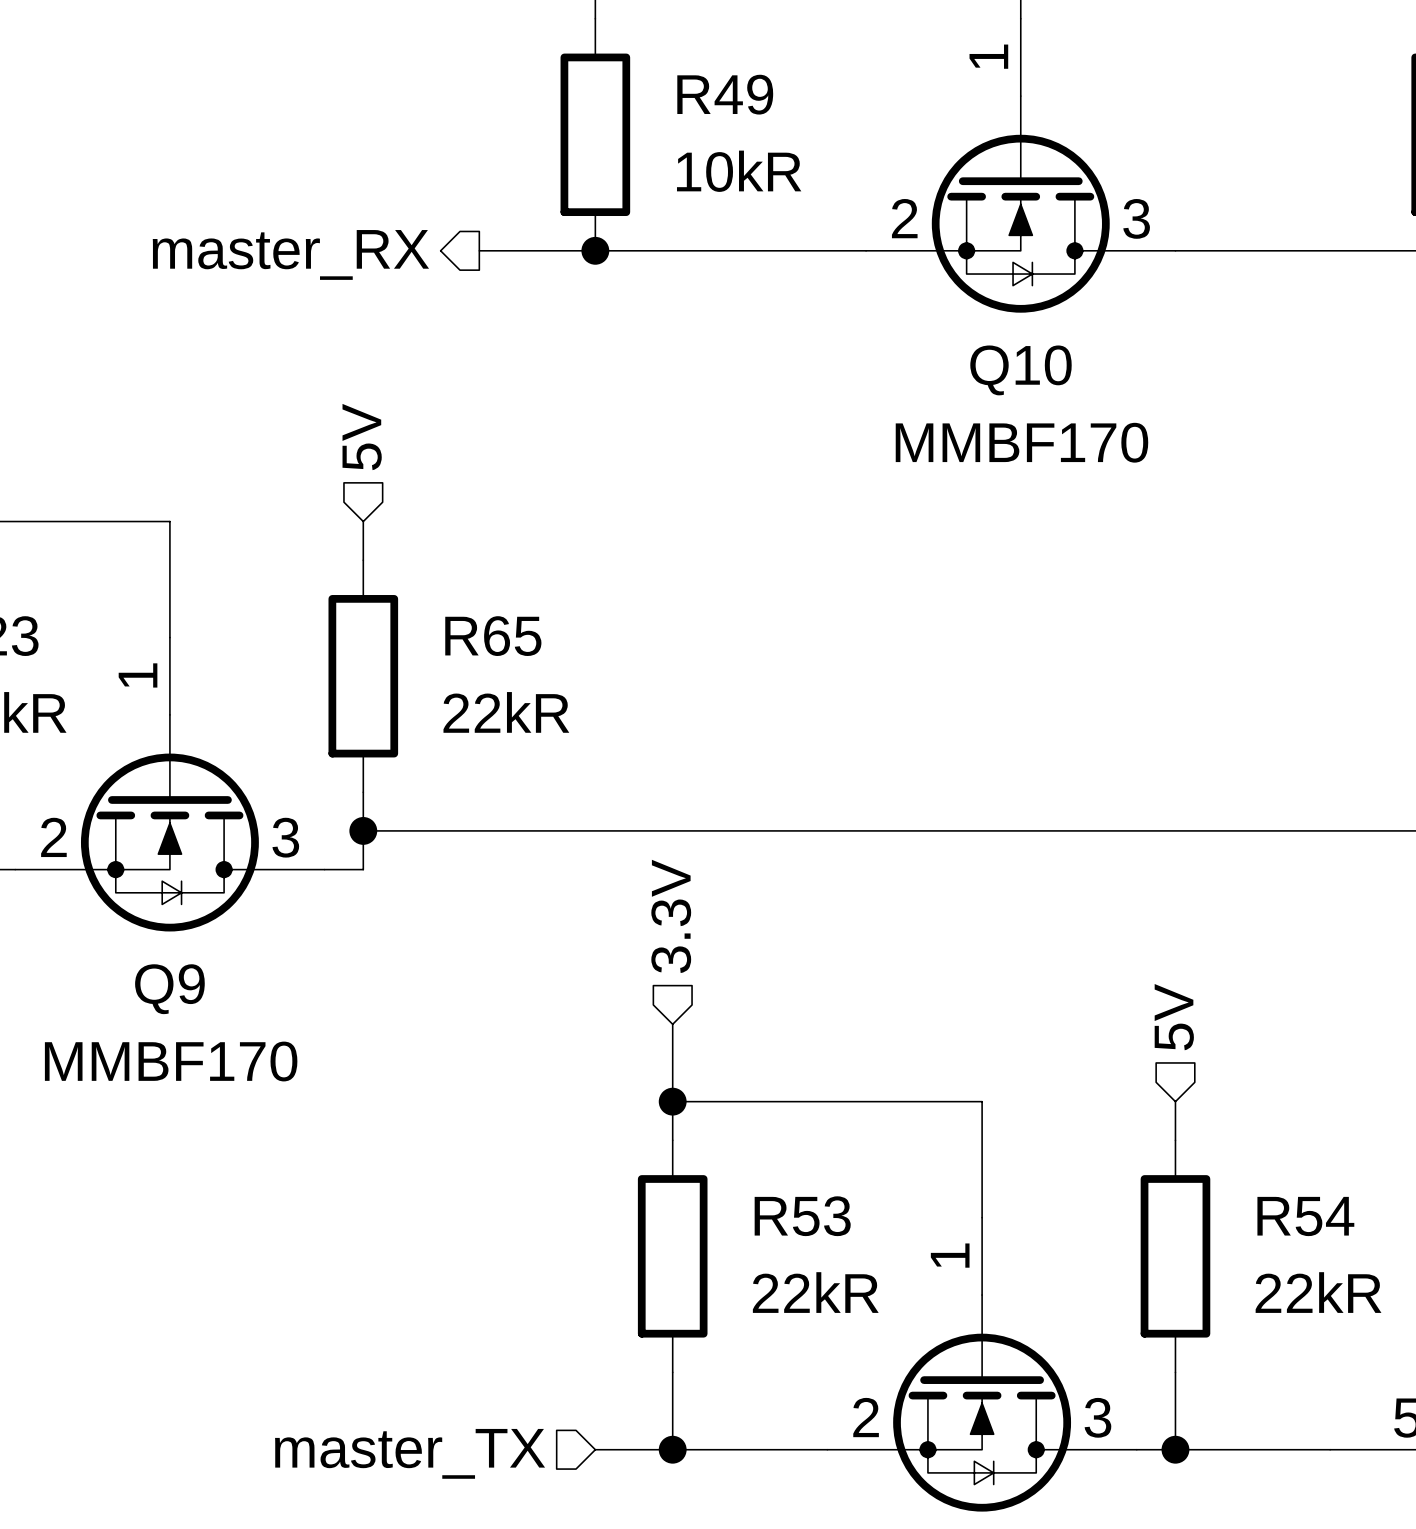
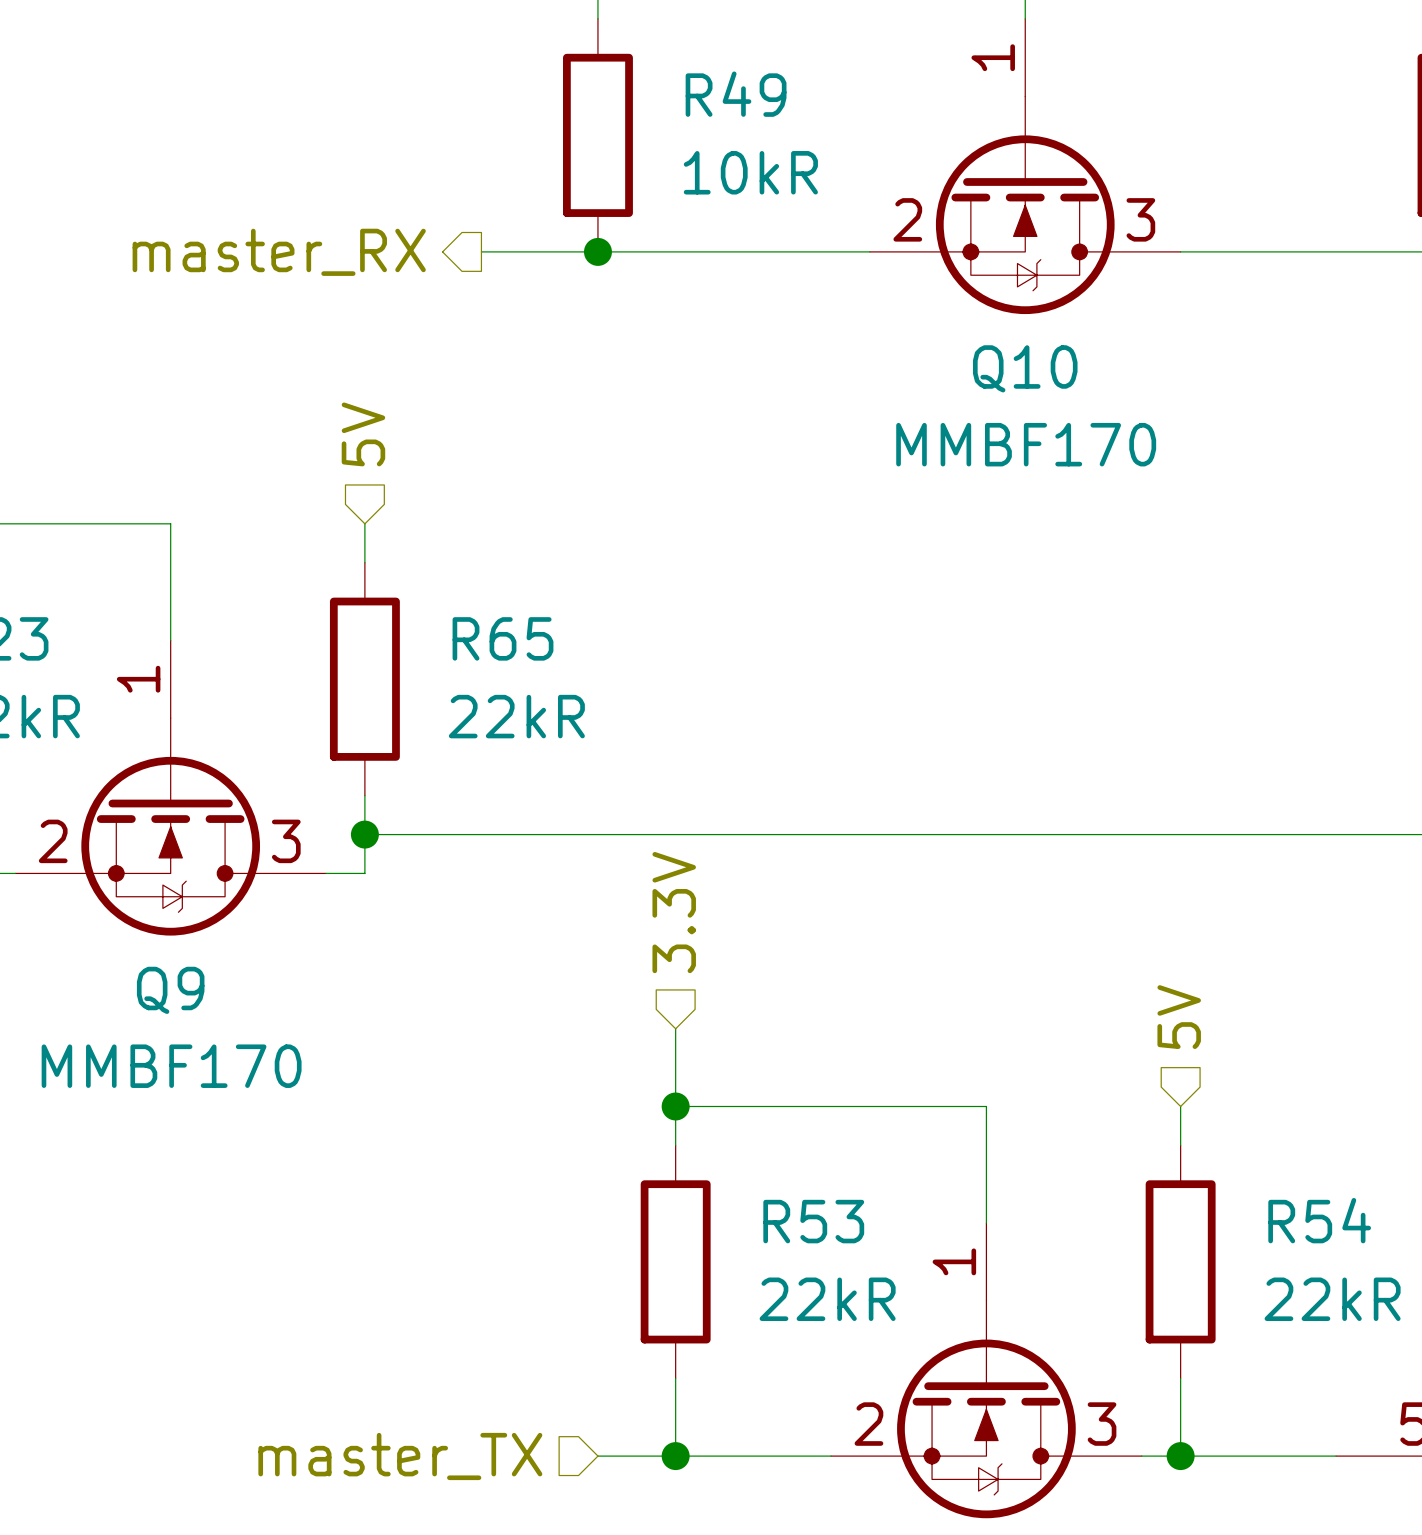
Q10 symbol: [866, 18, 1176, 313] -> [869, 18, 1181, 315]
Q9 symbol: [15, 637, 325, 932] -> [15, 640, 327, 936]
part symbol: [827, 1217, 1137, 1512] -> [831, 1223, 1142, 1519]

